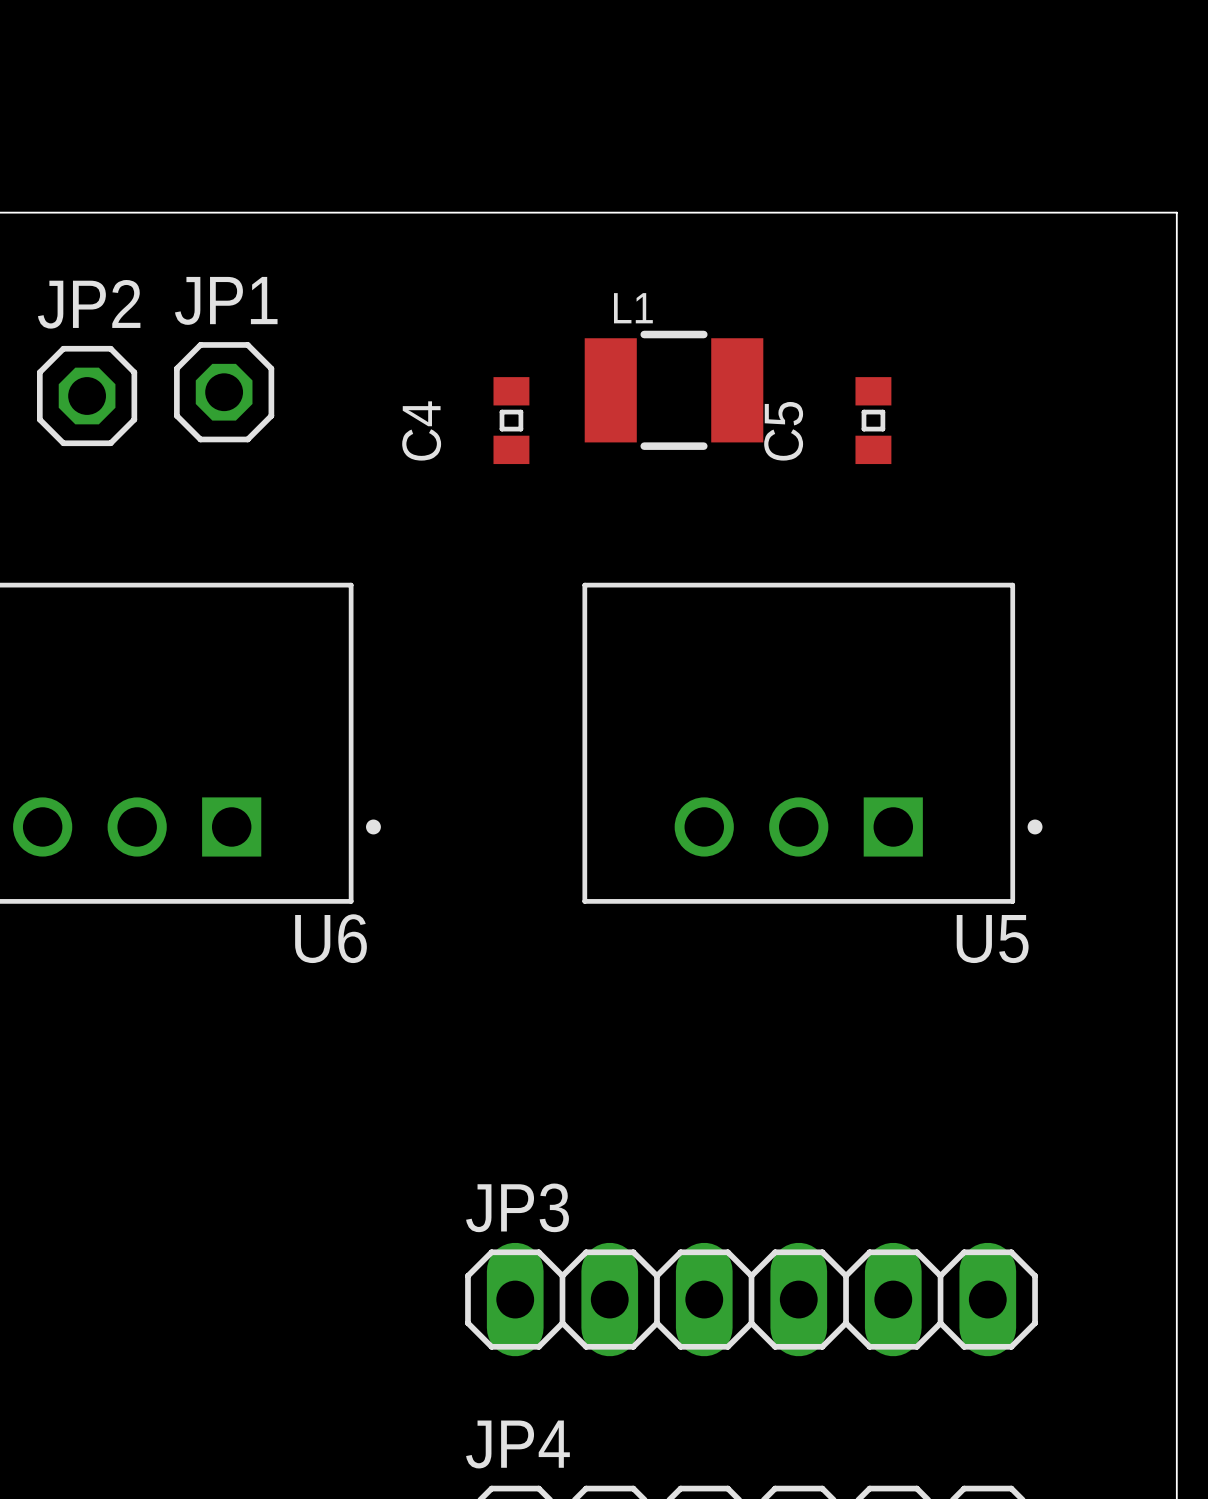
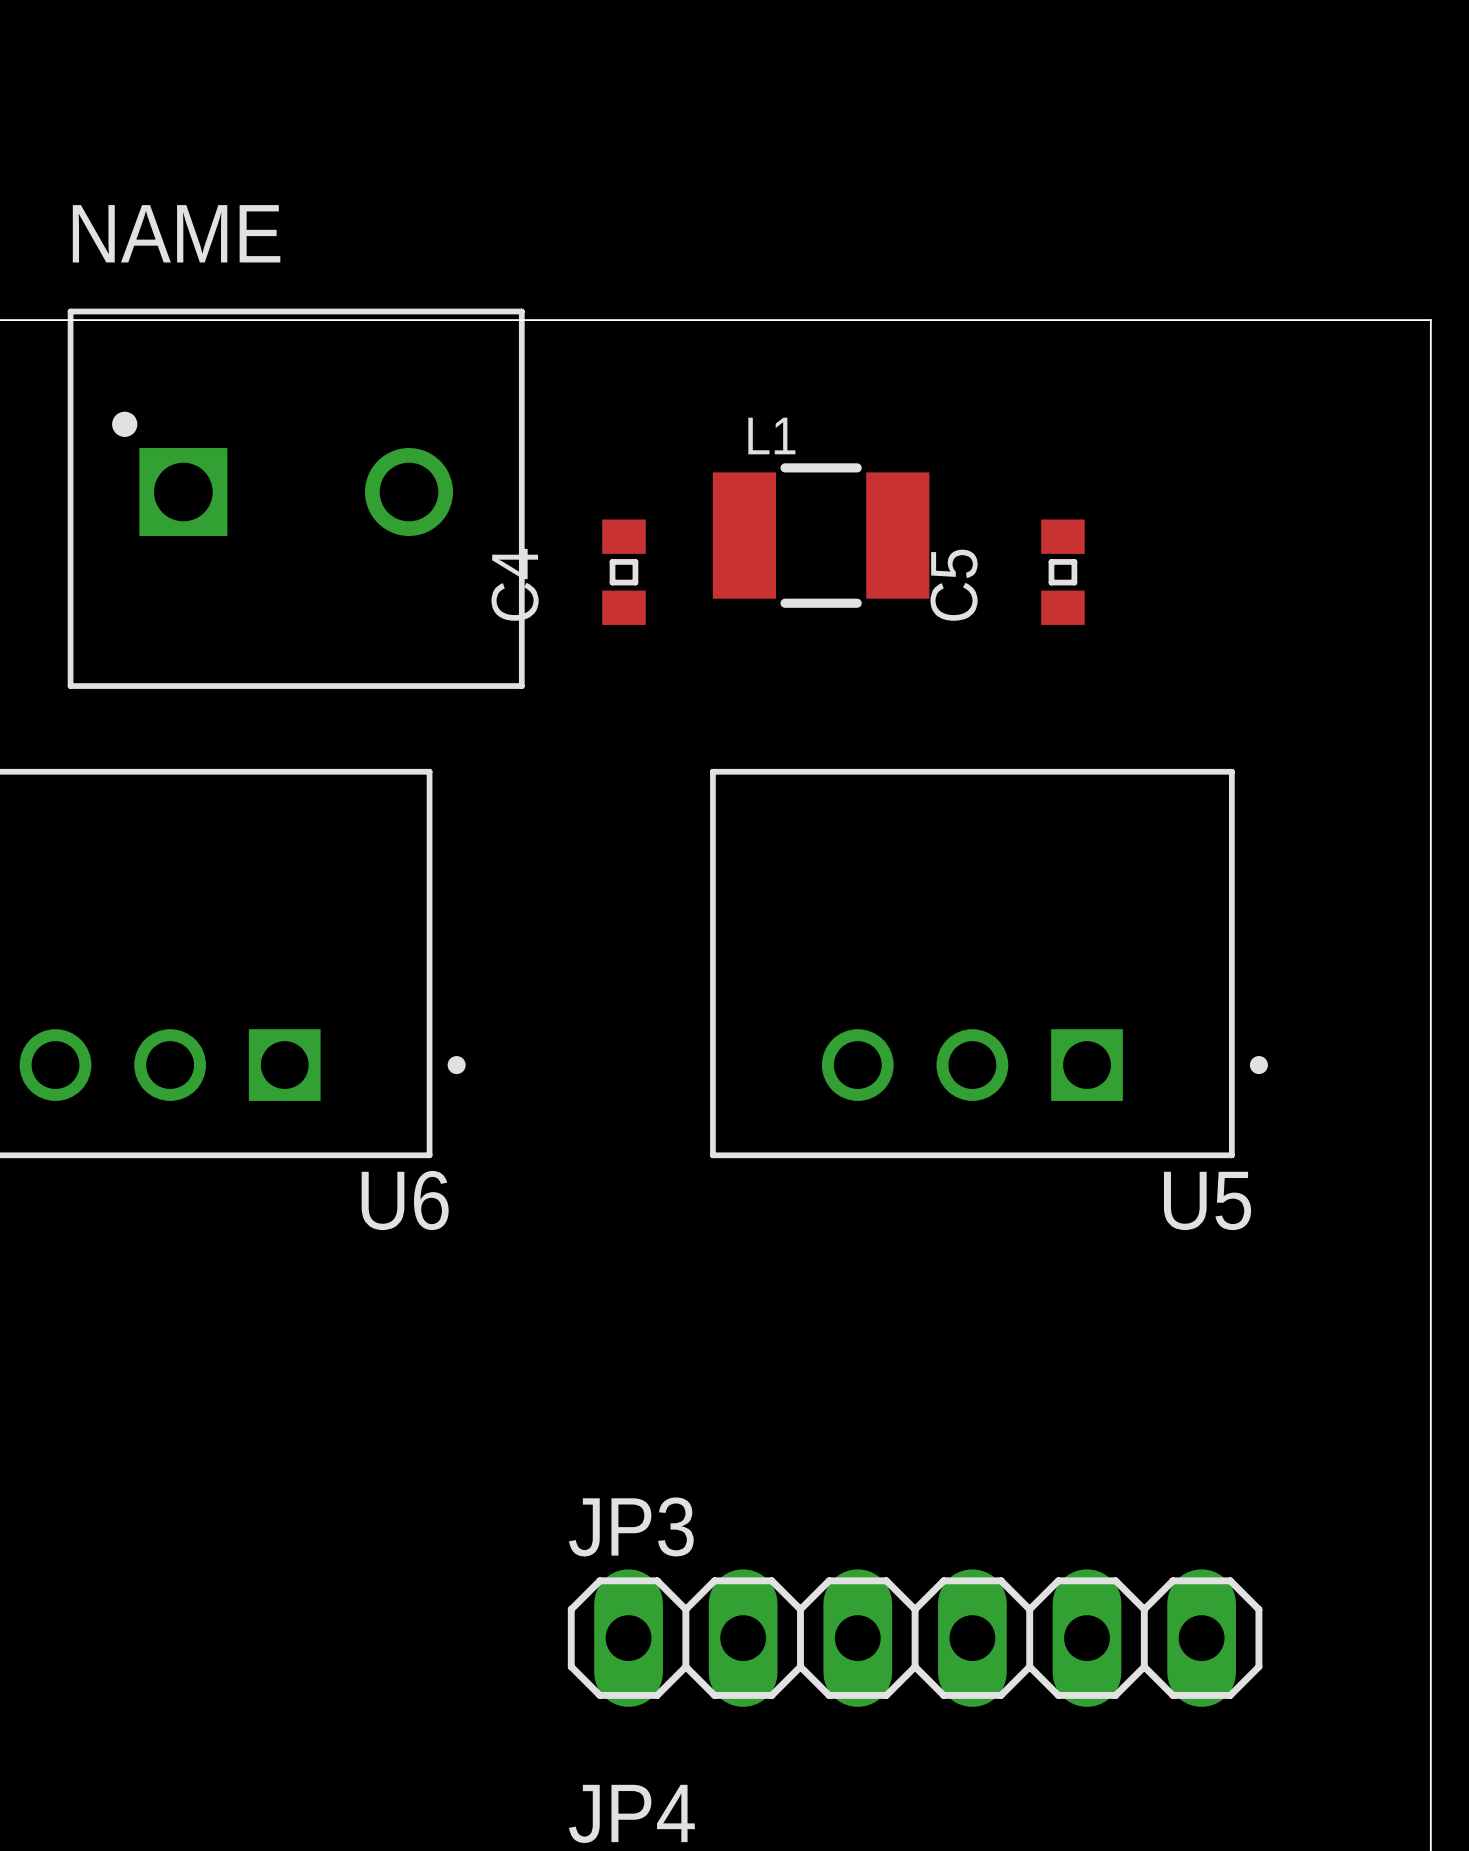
part: none -> (296, 498)
JP1: (224, 392) -> none
JP2: (87, 396) -> none

